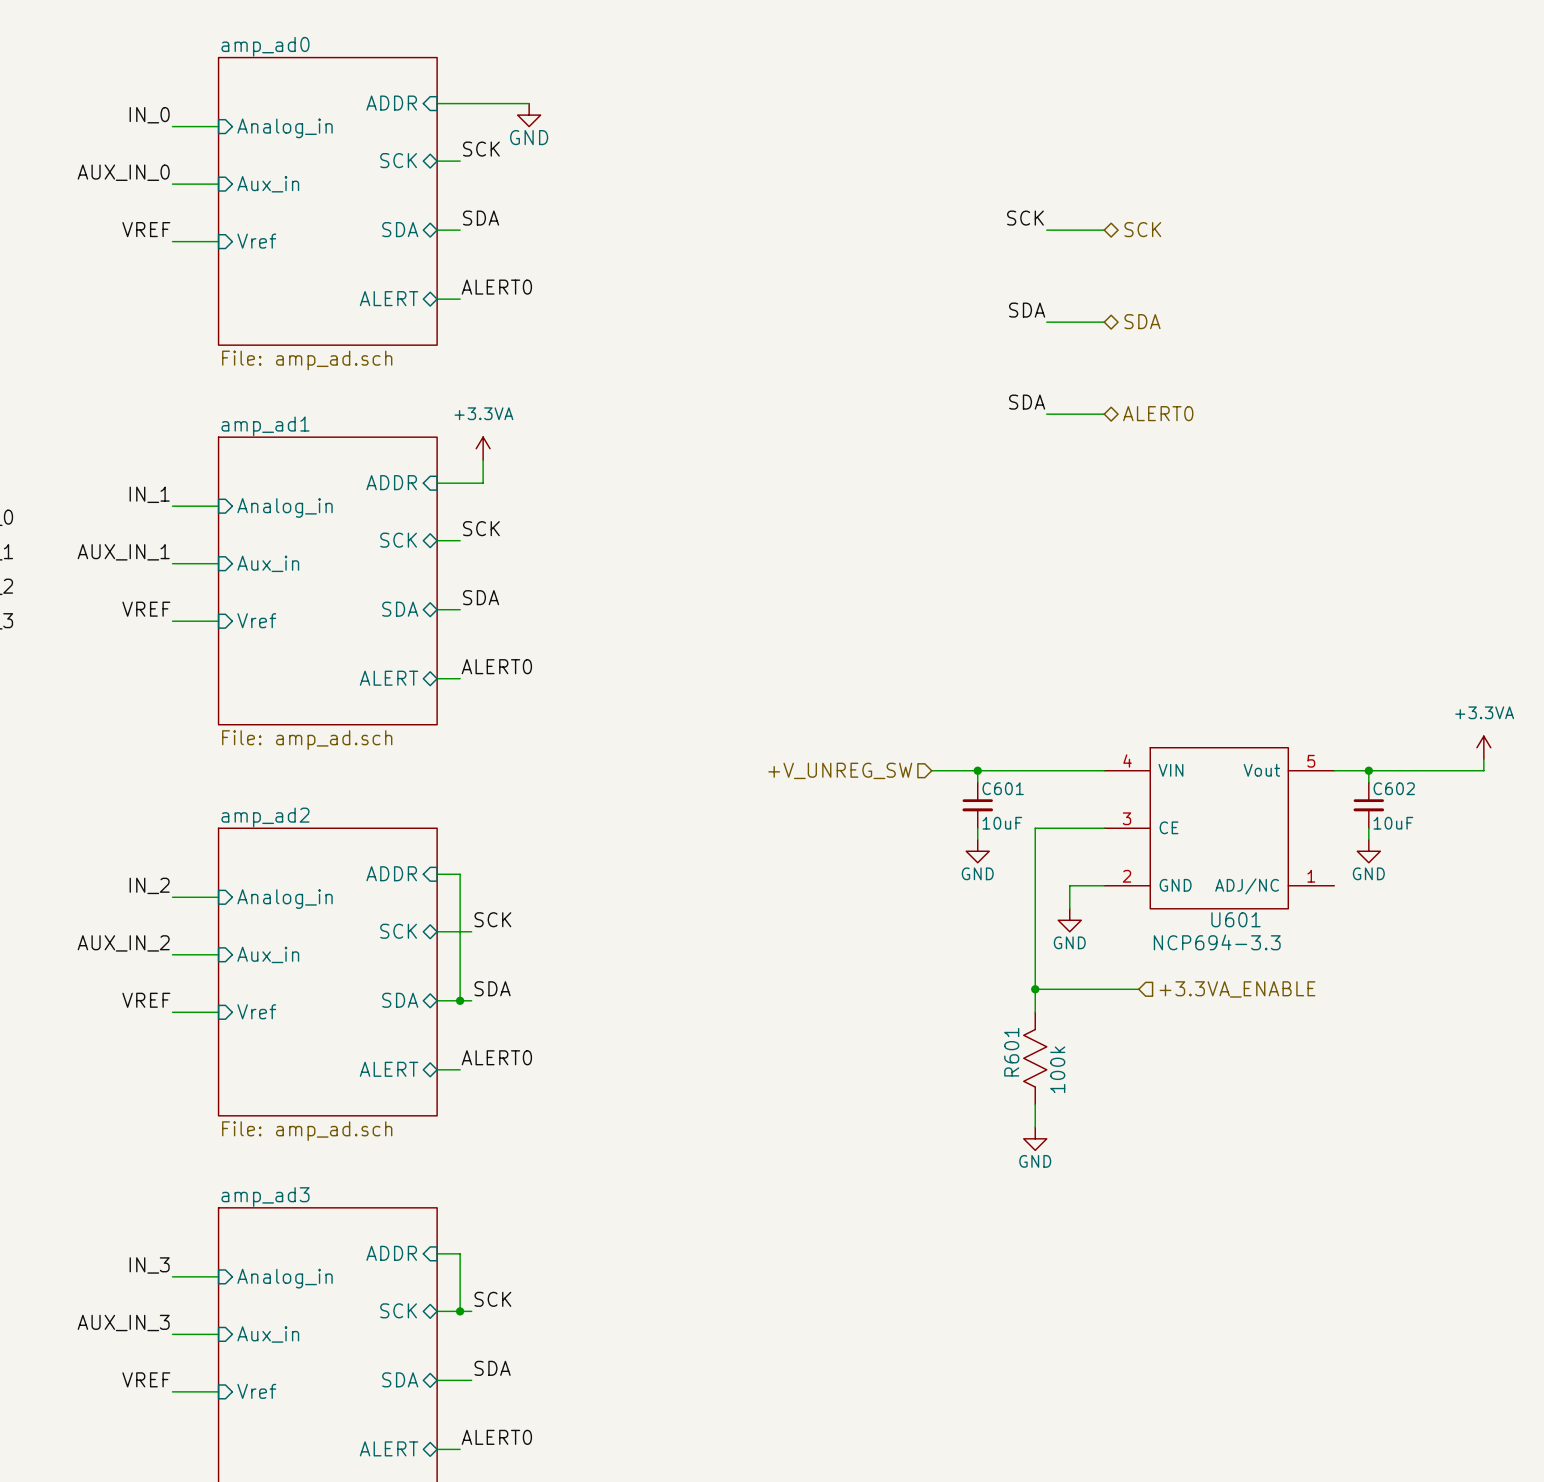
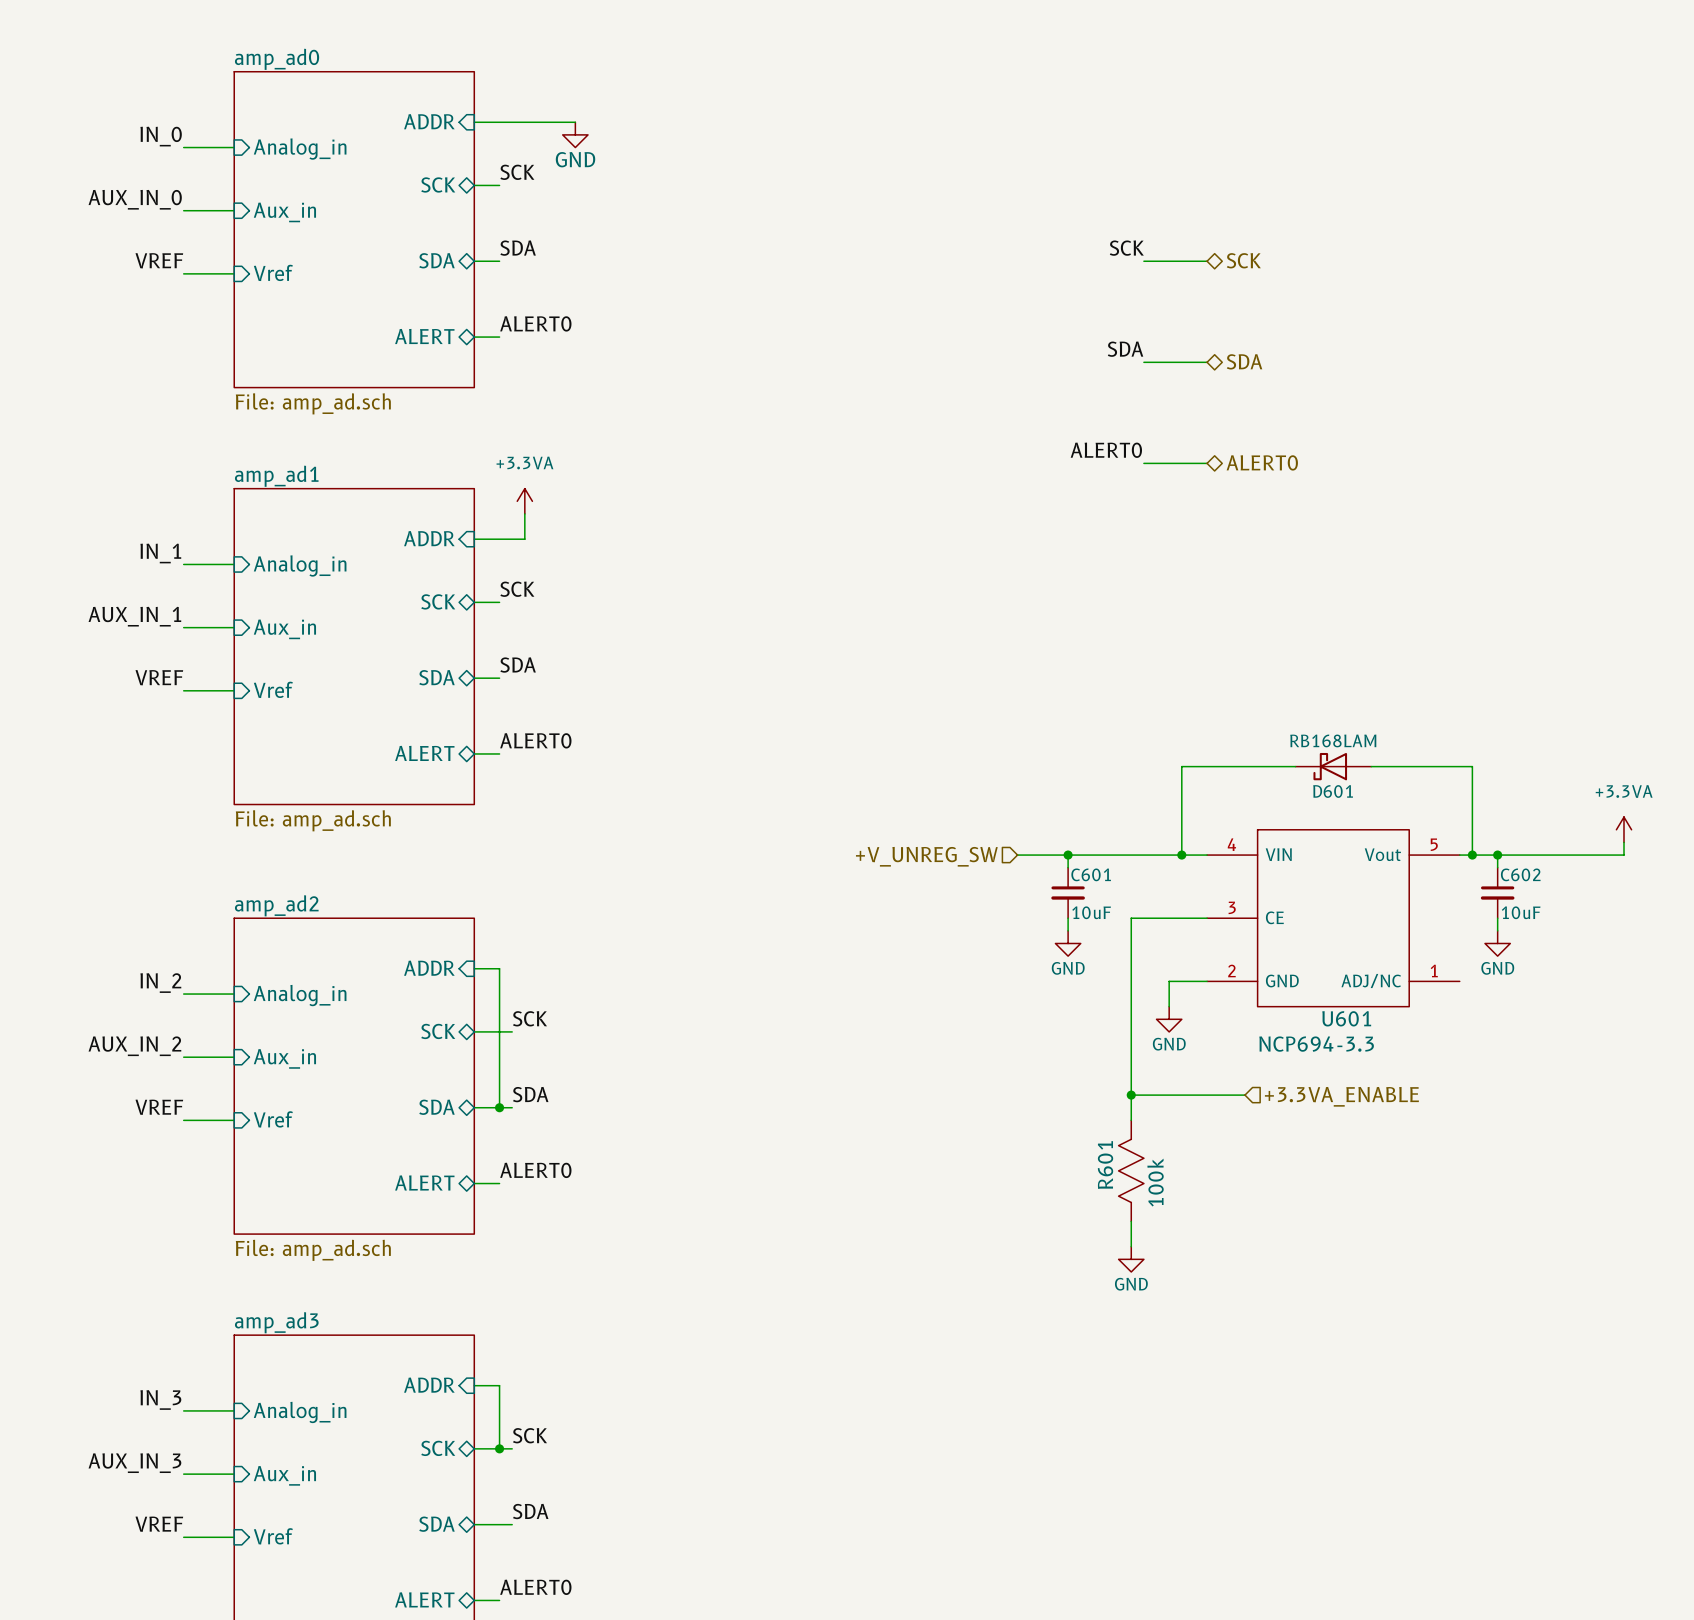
label: SDA (1027, 402) -> ALERT0 (1106, 450)
wire: none -> (1295, 766) (1181, 766) (1181, 855)
D601: none -> RB168LAM (1333, 766)
wire: none -> (1371, 766) (1472, 766) (1472, 855)
junction: none -> (1181, 855)
junction: none -> (1472, 855)

